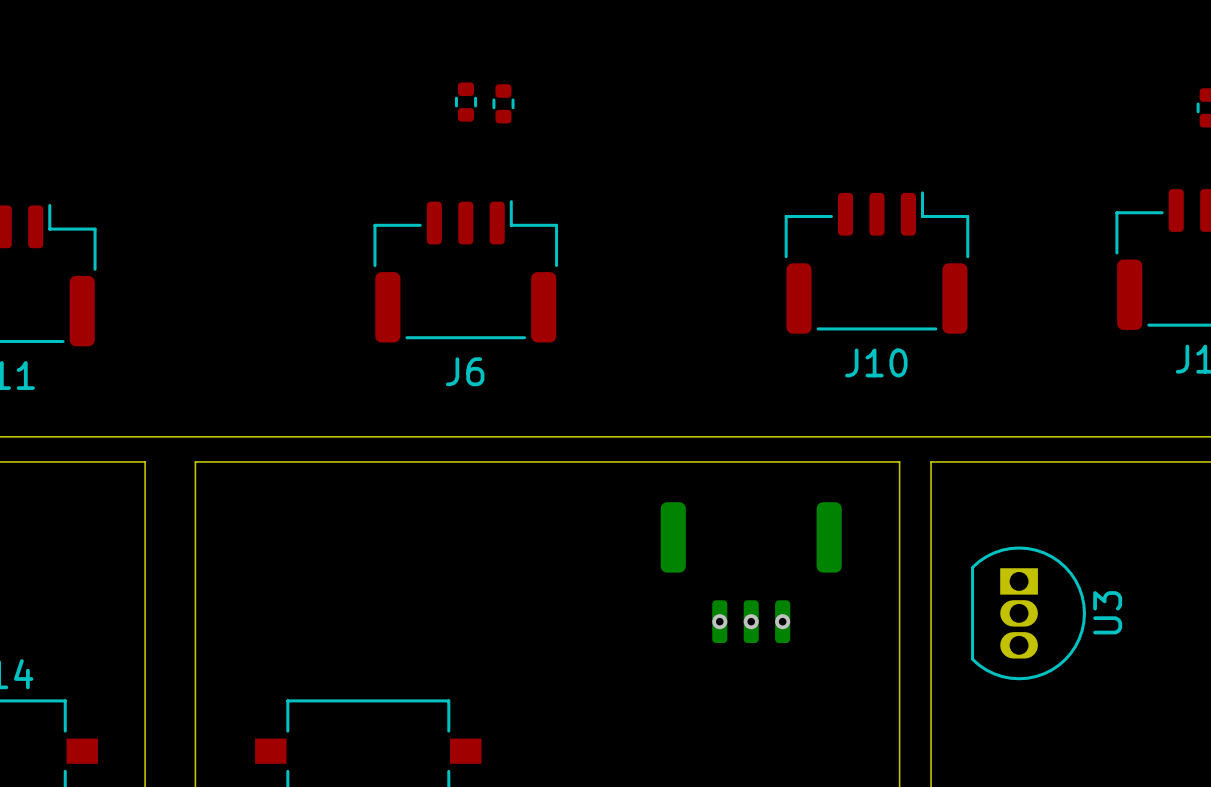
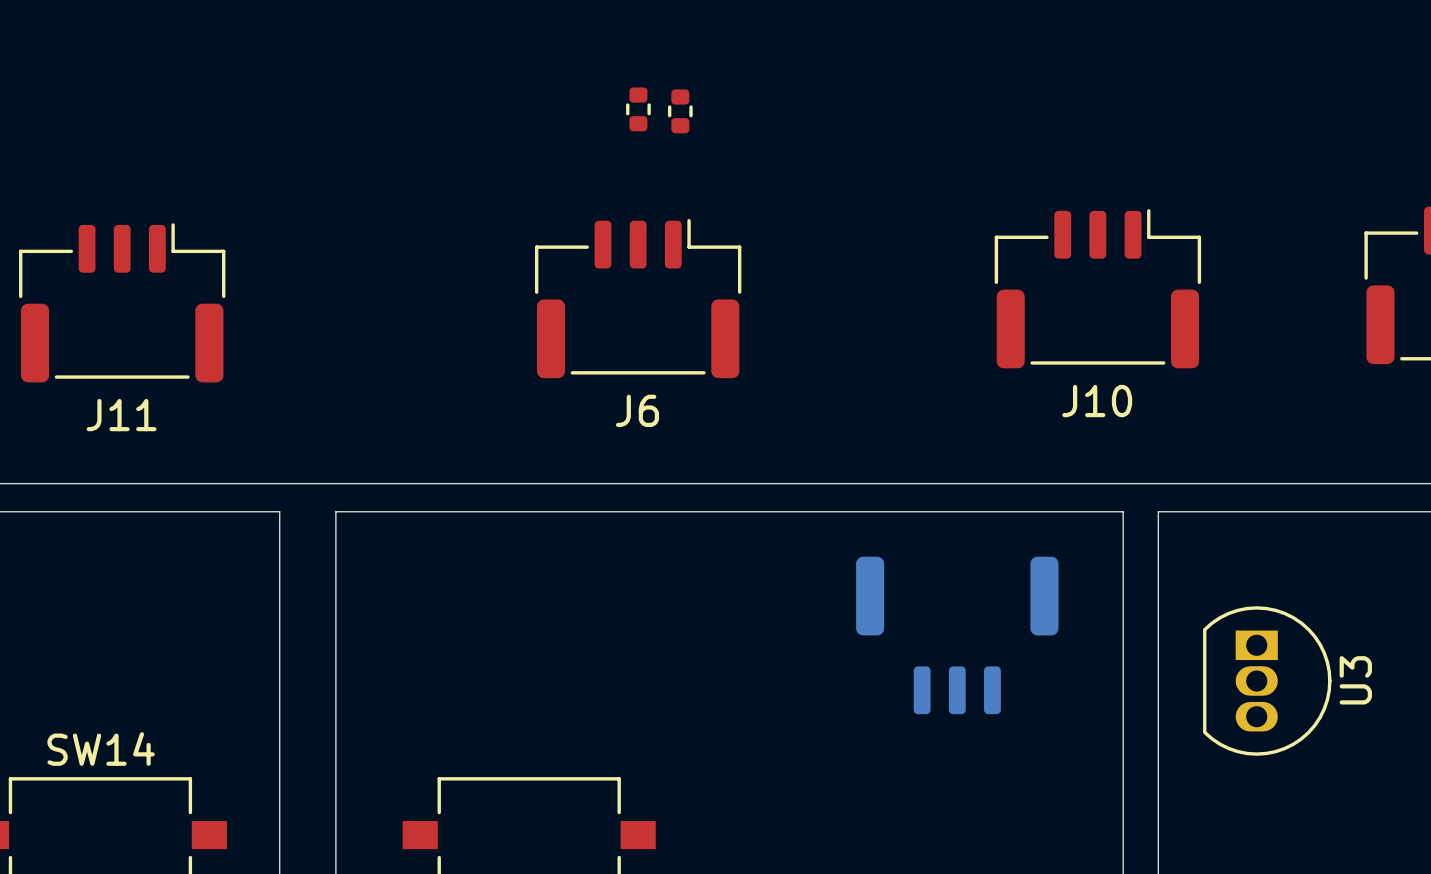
via: (719, 621) -> none
via: (751, 621) -> none
via: (782, 621) -> none

